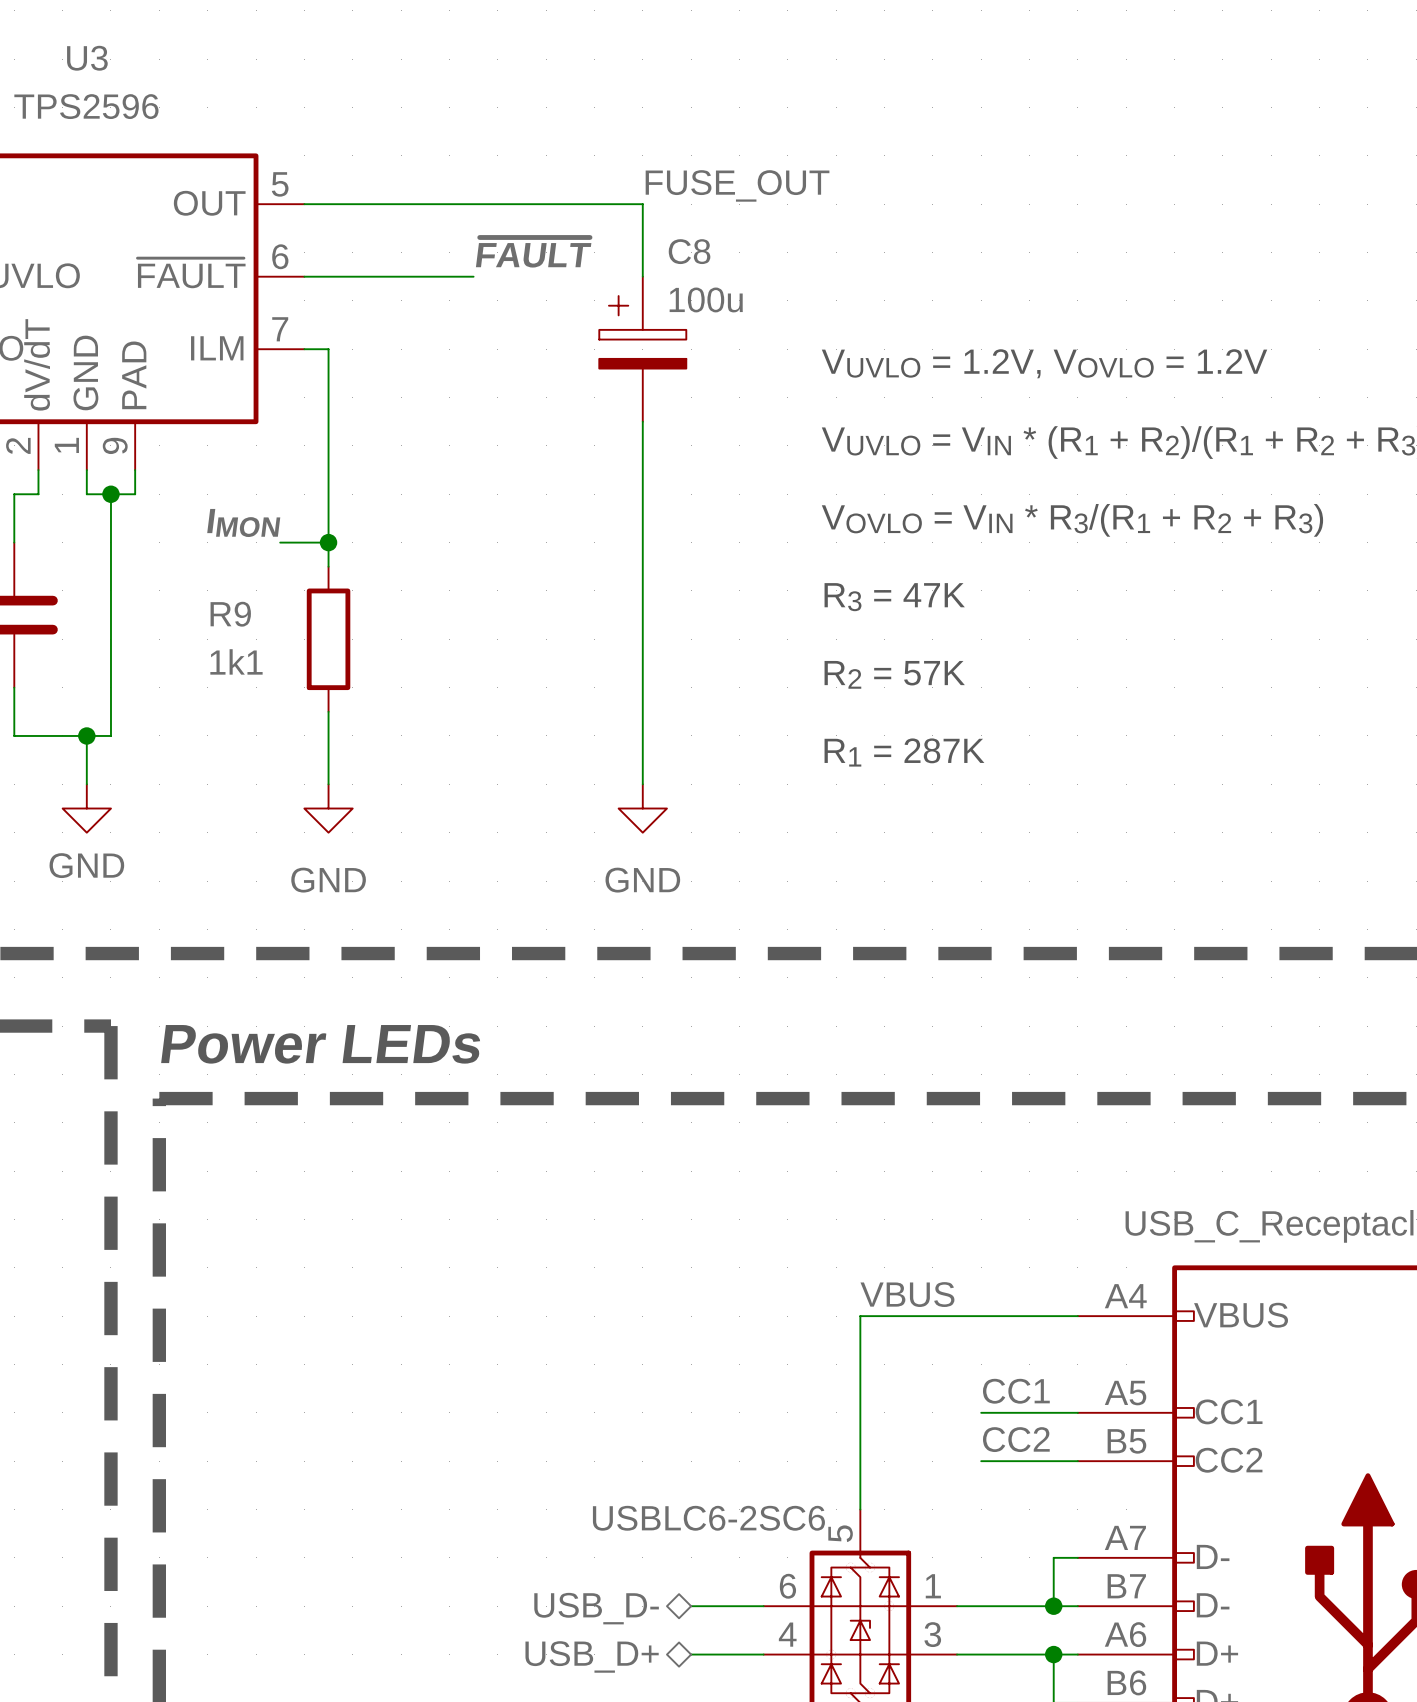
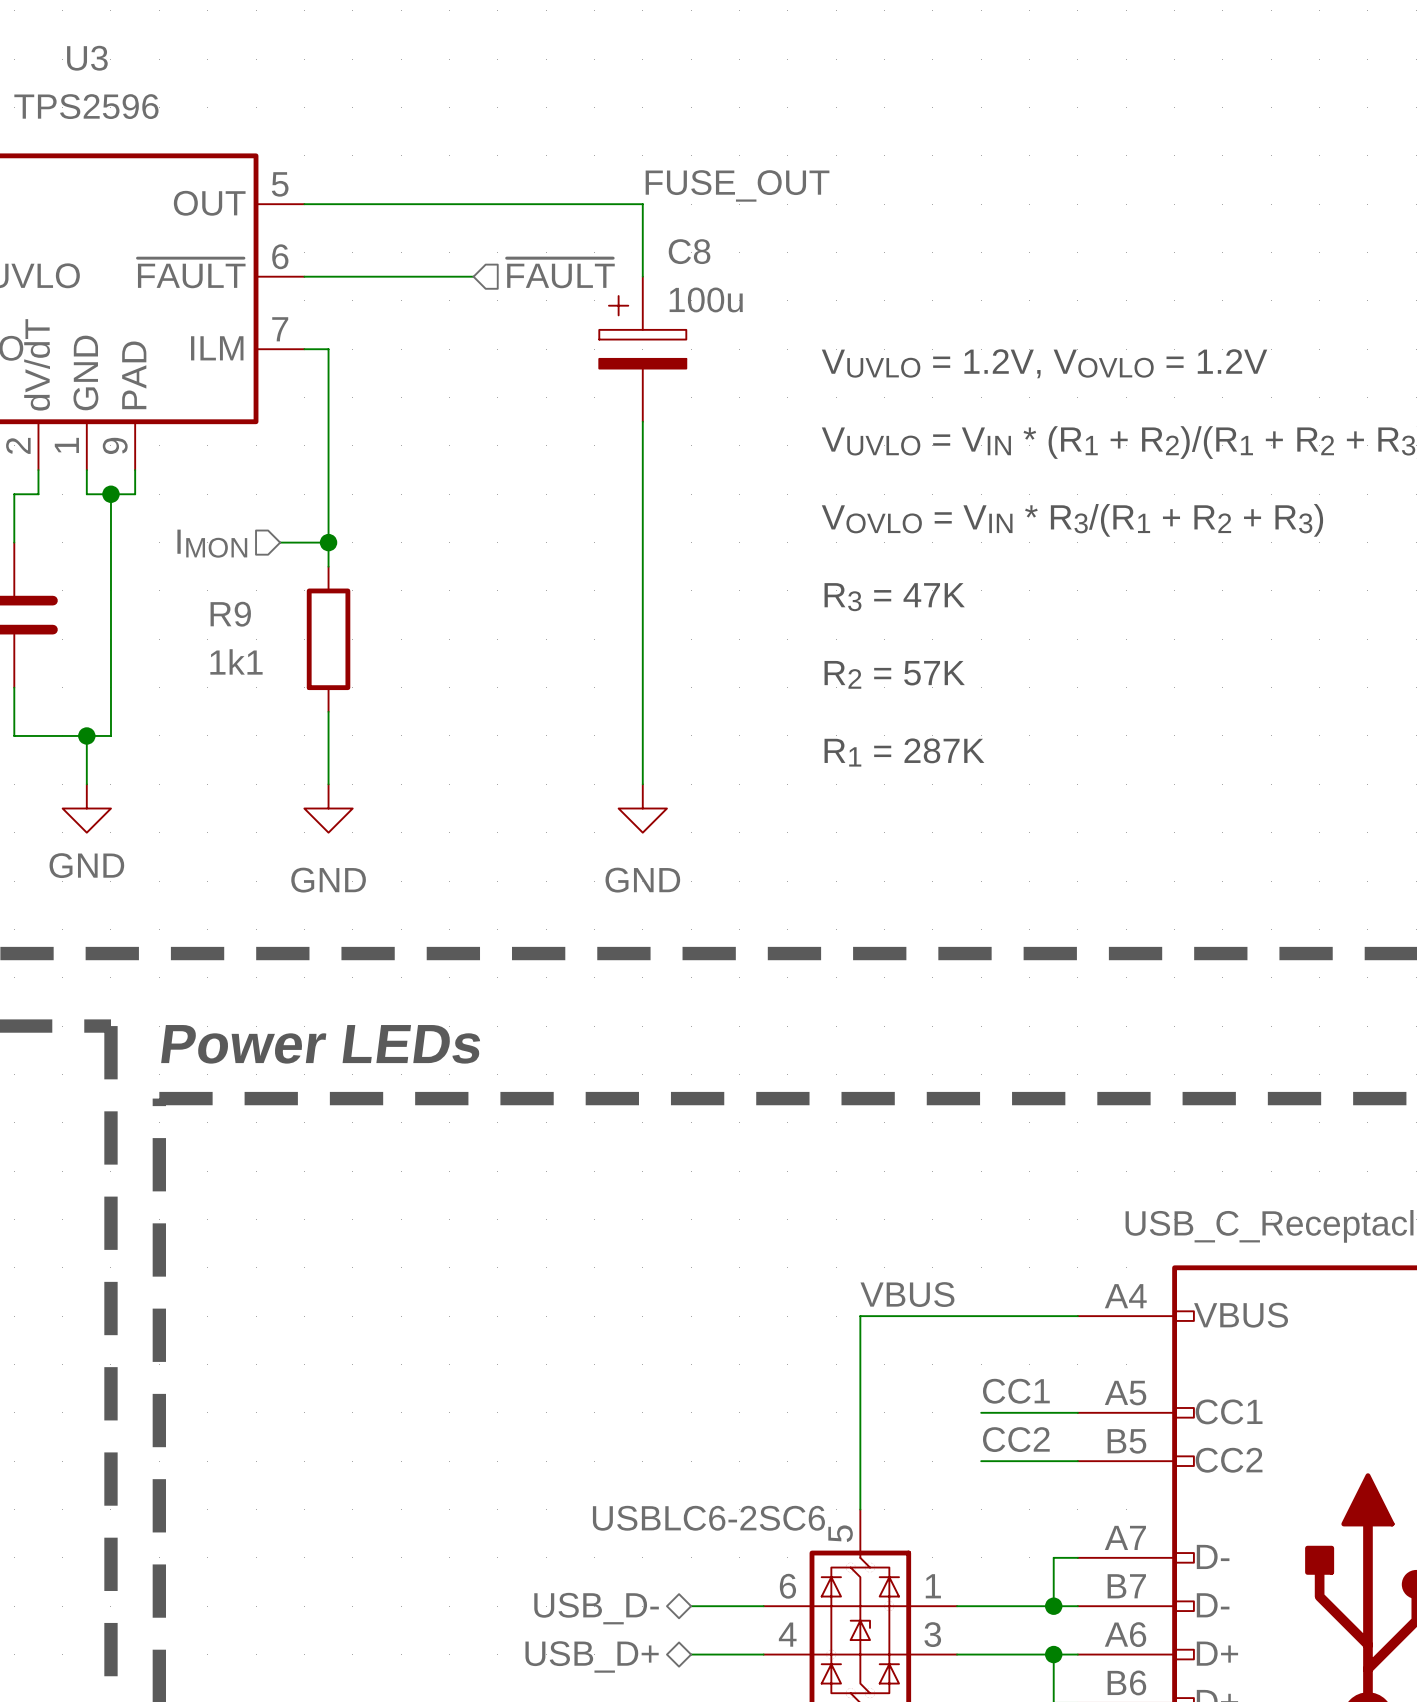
label: ~{FAULT} (533, 252) -> none
hierarchical label: none -> ~{FAULT} (560, 273)
label: IMON (243, 522) -> none
hierarchical label: none -> IMON (212, 543)

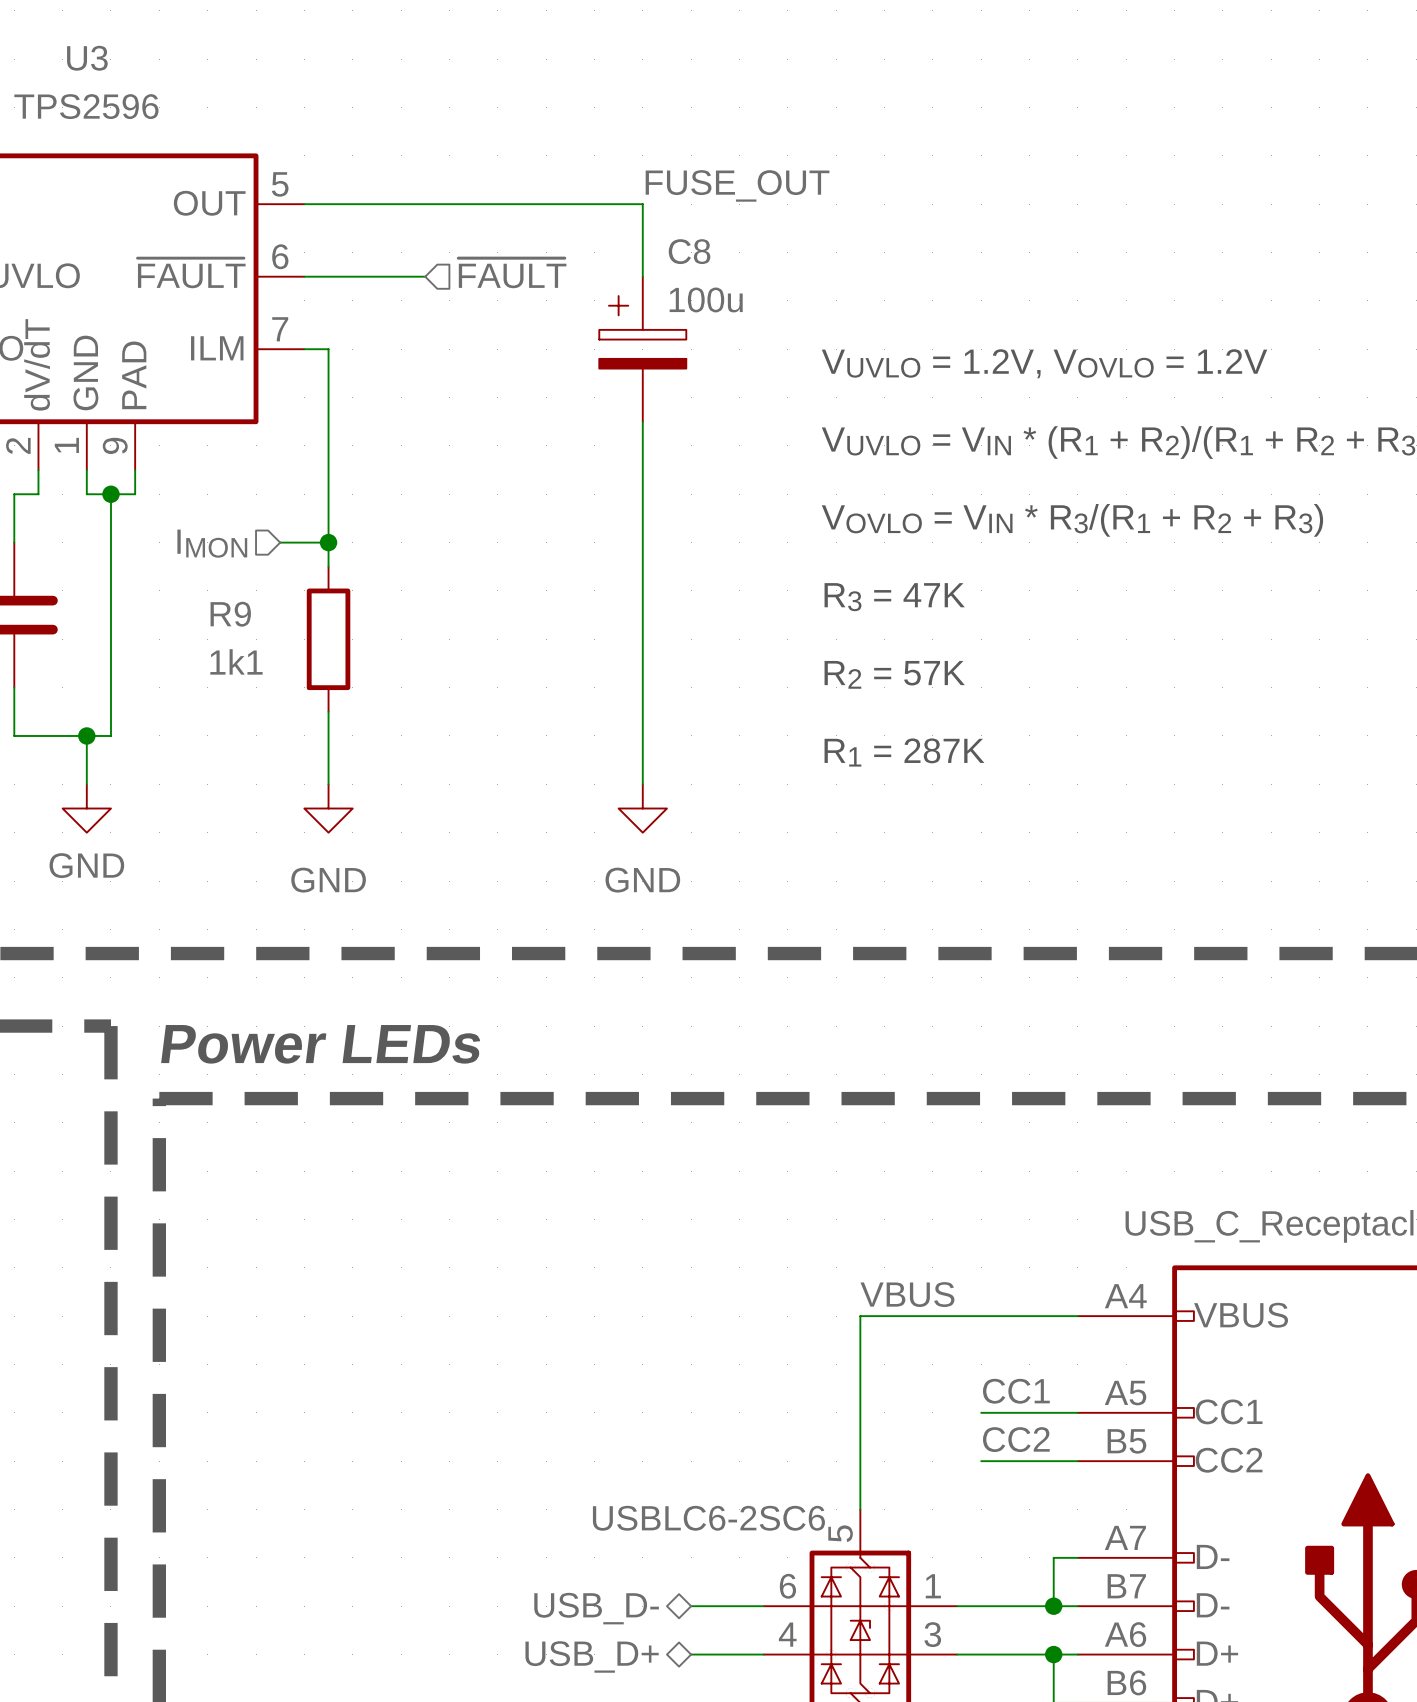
hierarchical label position: ~{FAULT} (560, 273) -> ~{FAULT} (512, 273)
wire: (425, 276) (473, 276) -> none

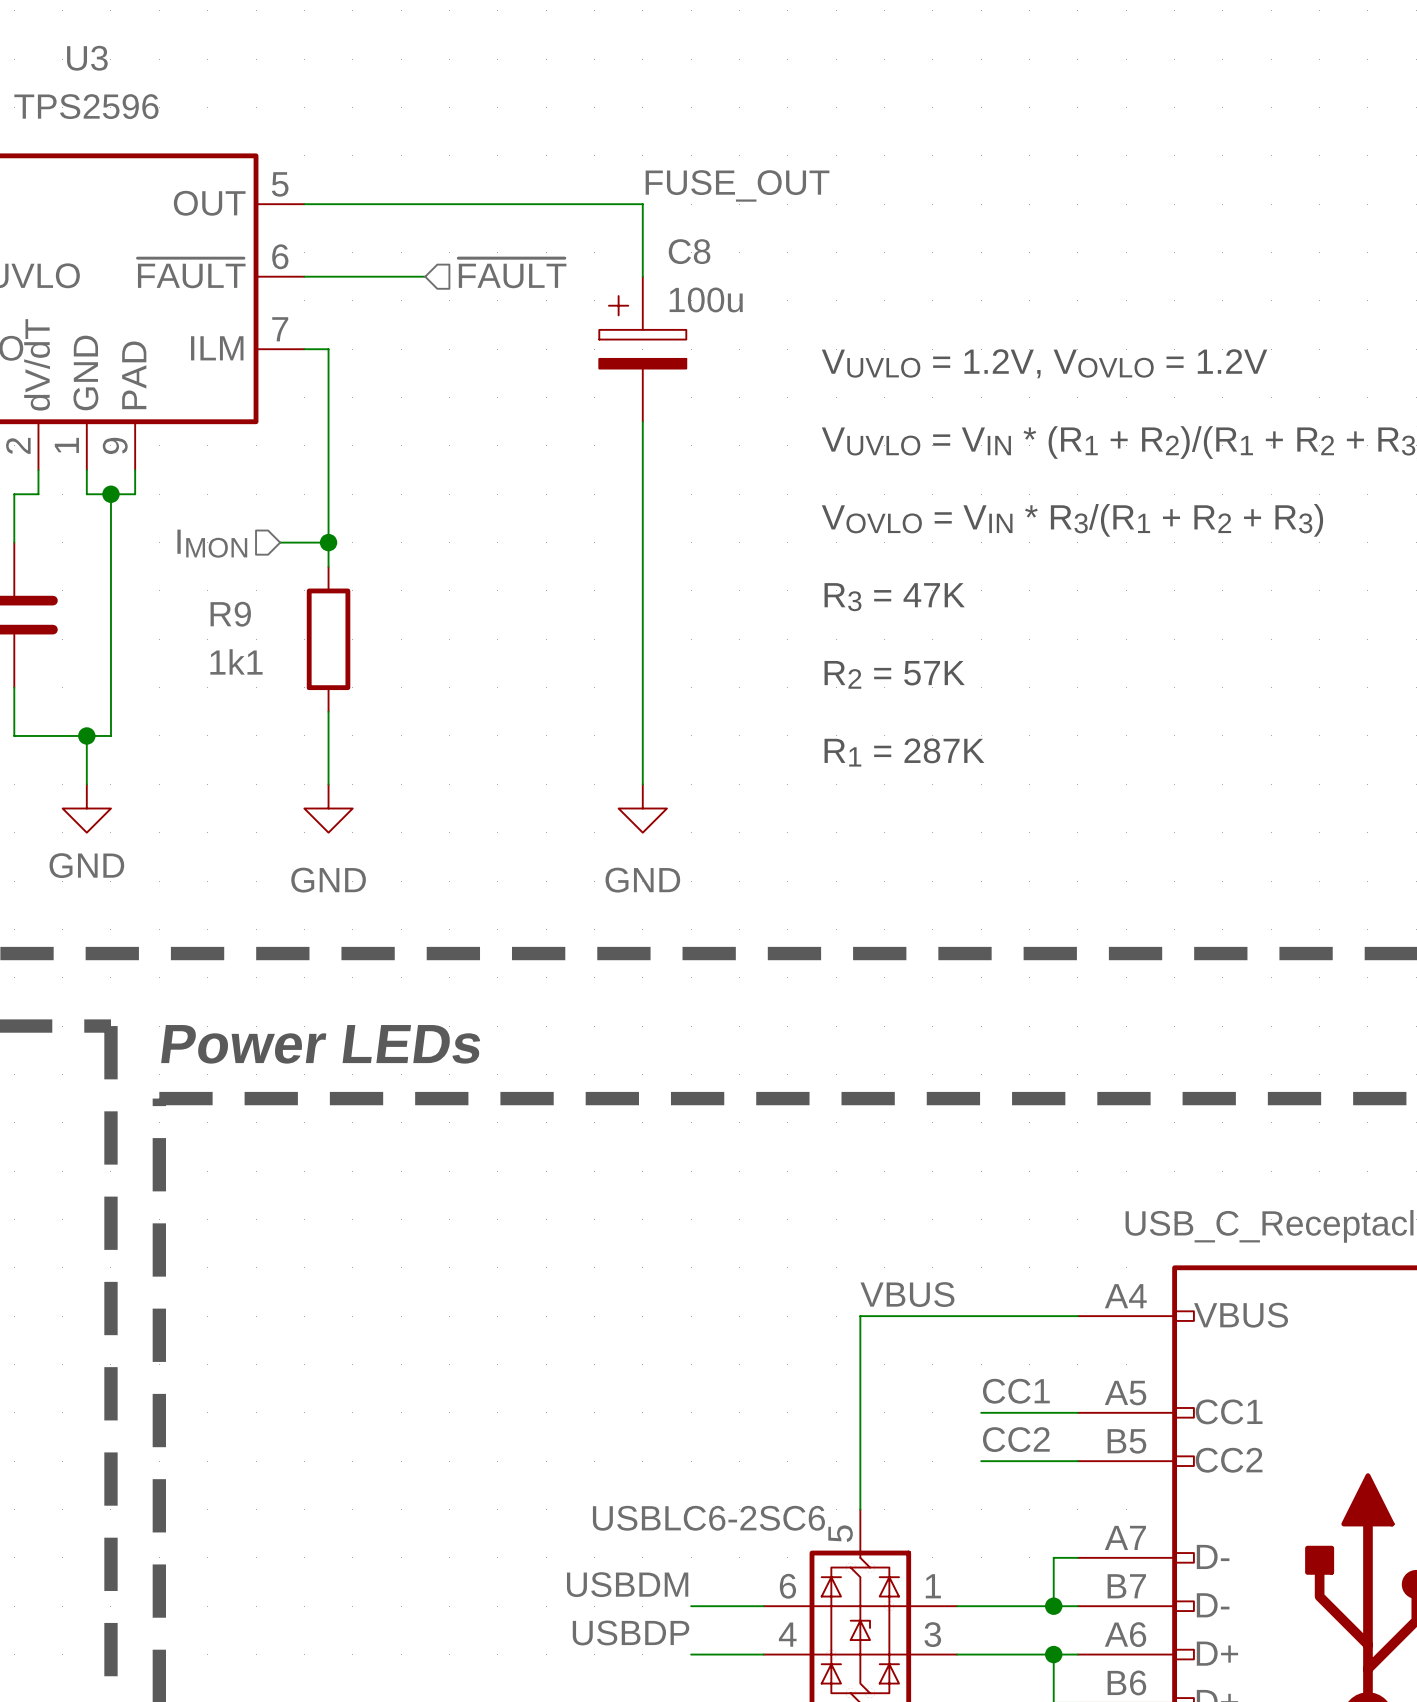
label: none -> USBDM (627, 1584)
hierarchical label: USB_D- (596, 1608) -> none
label: none -> USBDP (631, 1632)
hierarchical label: USB_D+ (592, 1656) -> none

